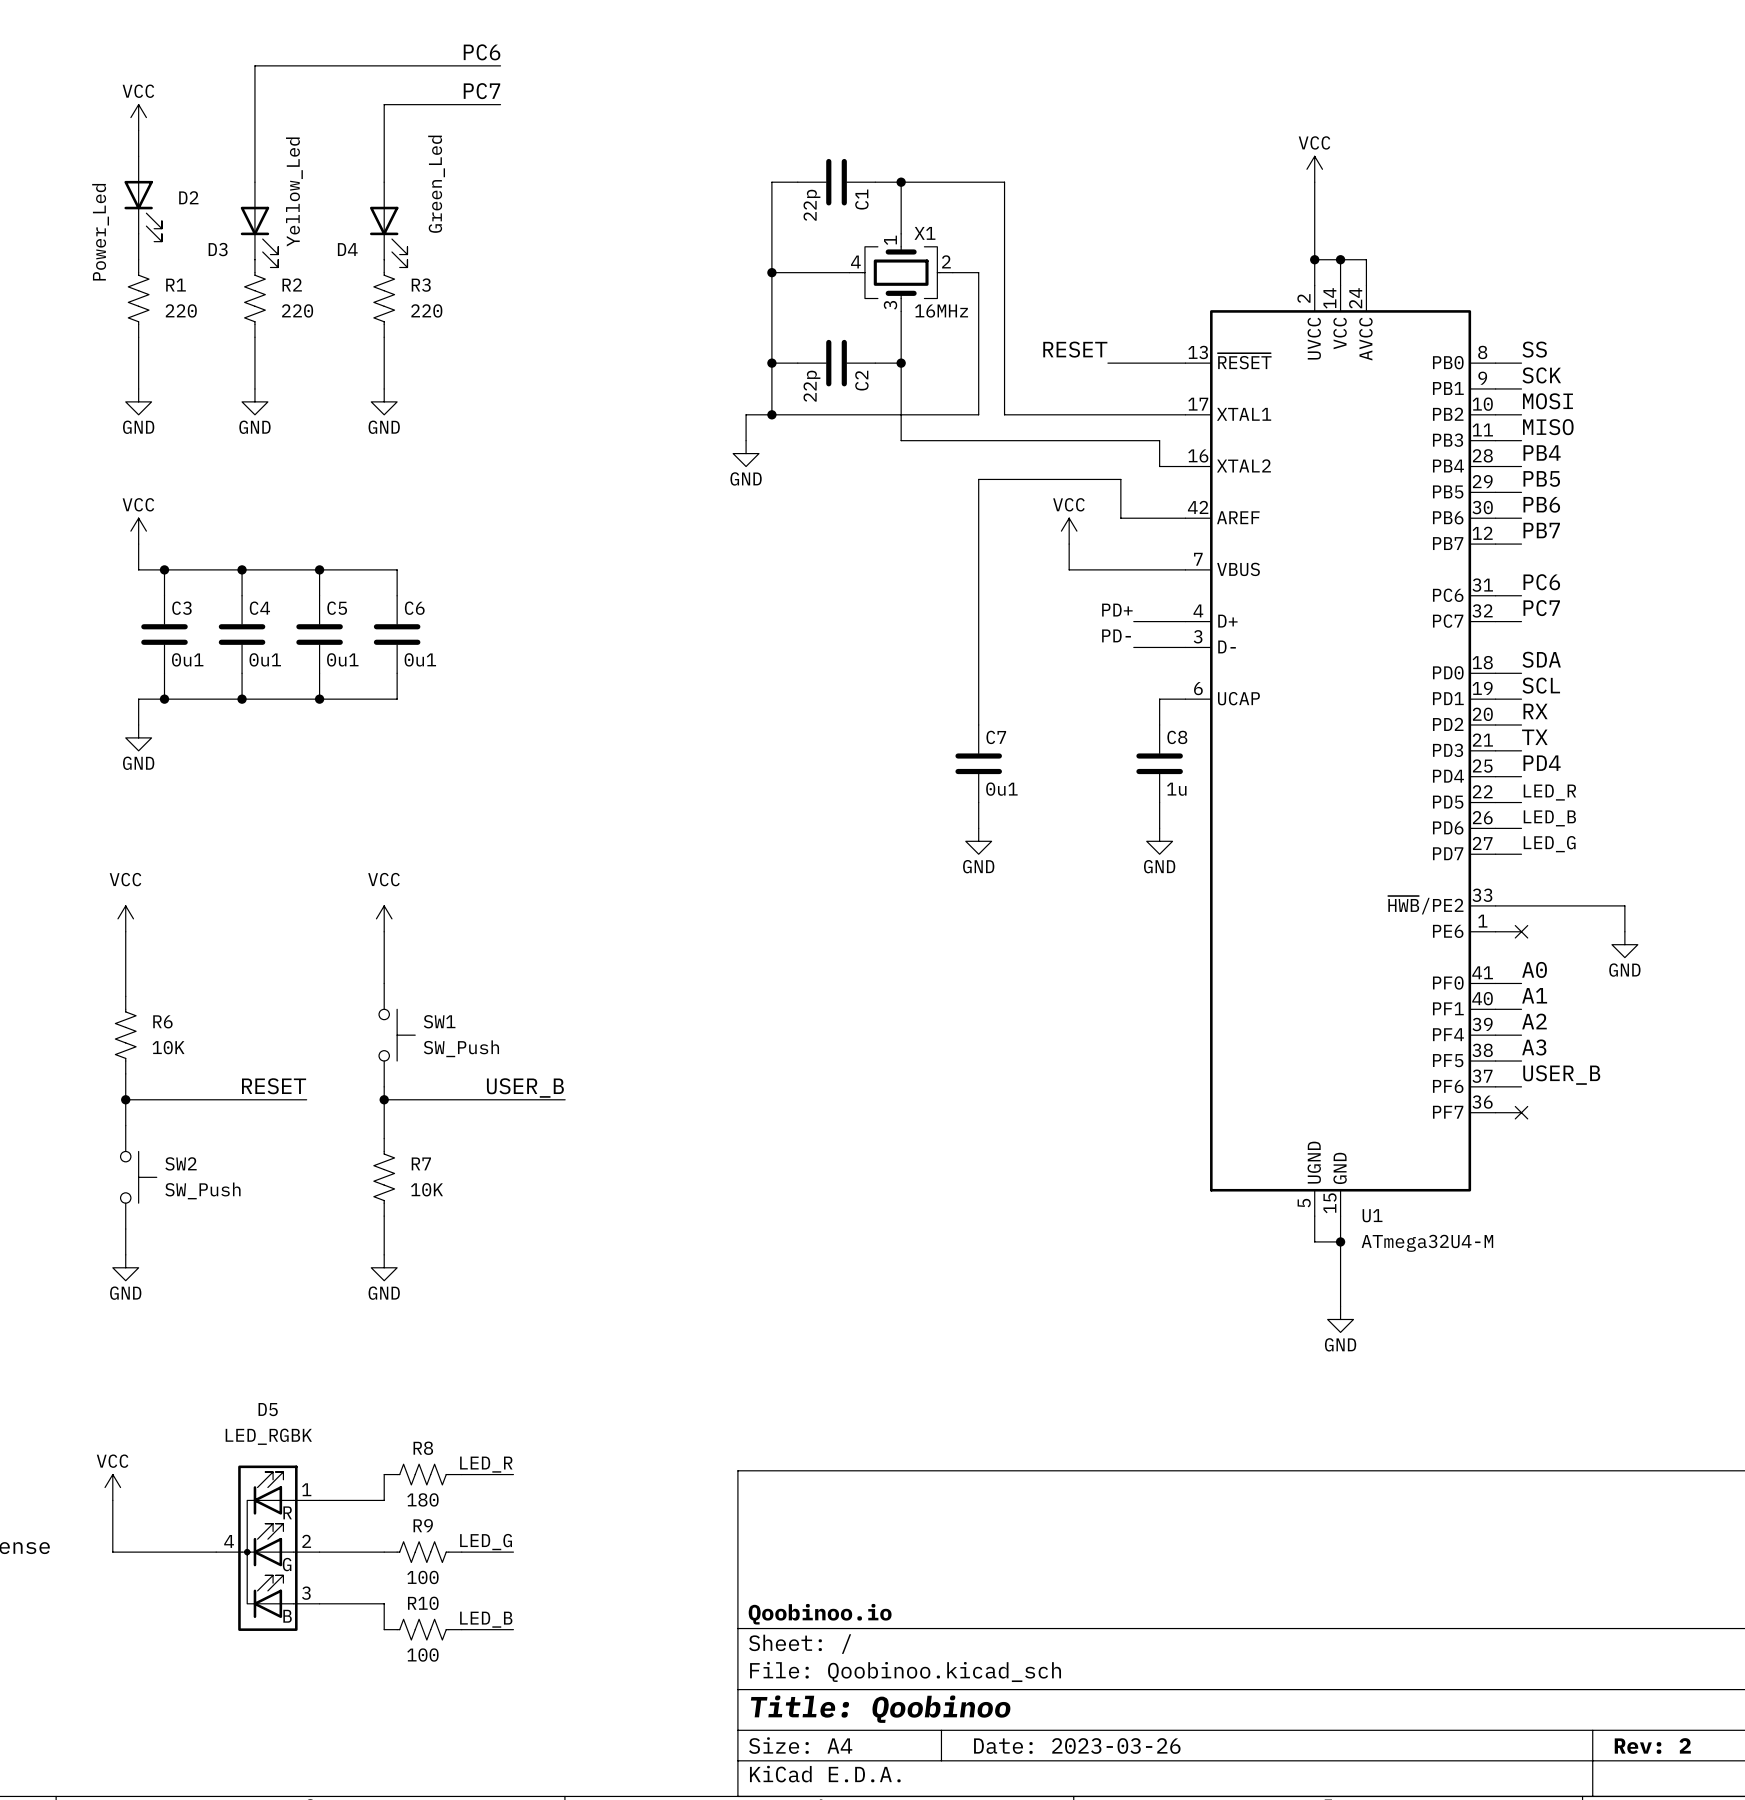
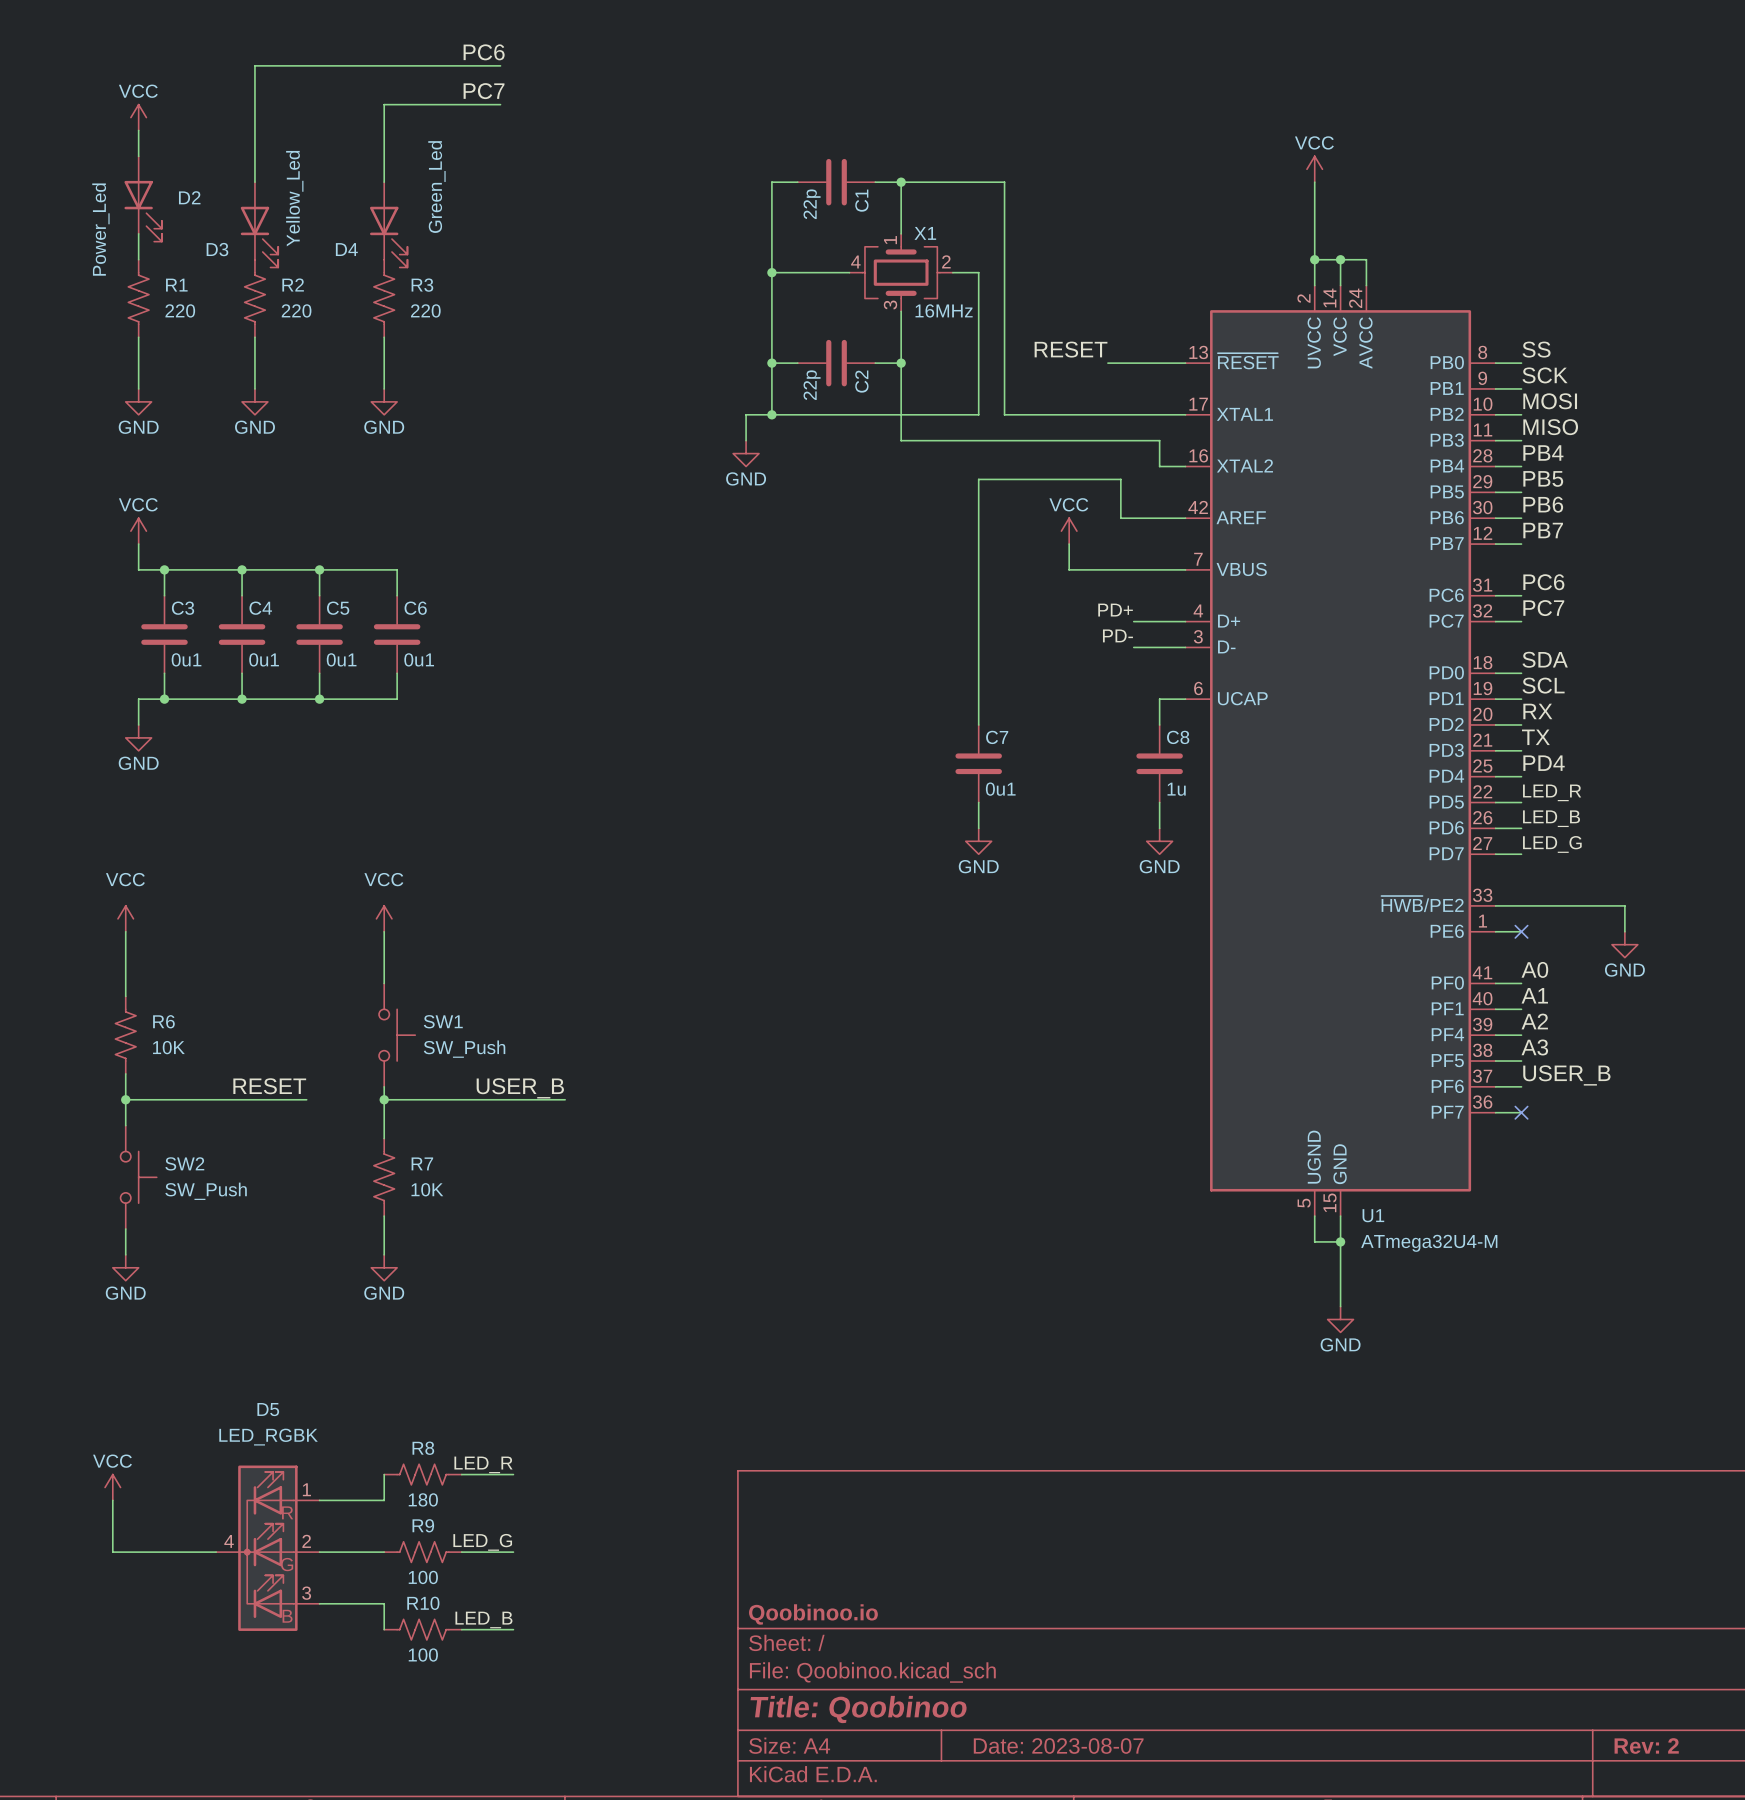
title block: Date: 2023-03-26 (1077, 1746) -> Date: 2023-08-07 (1058, 1746)

